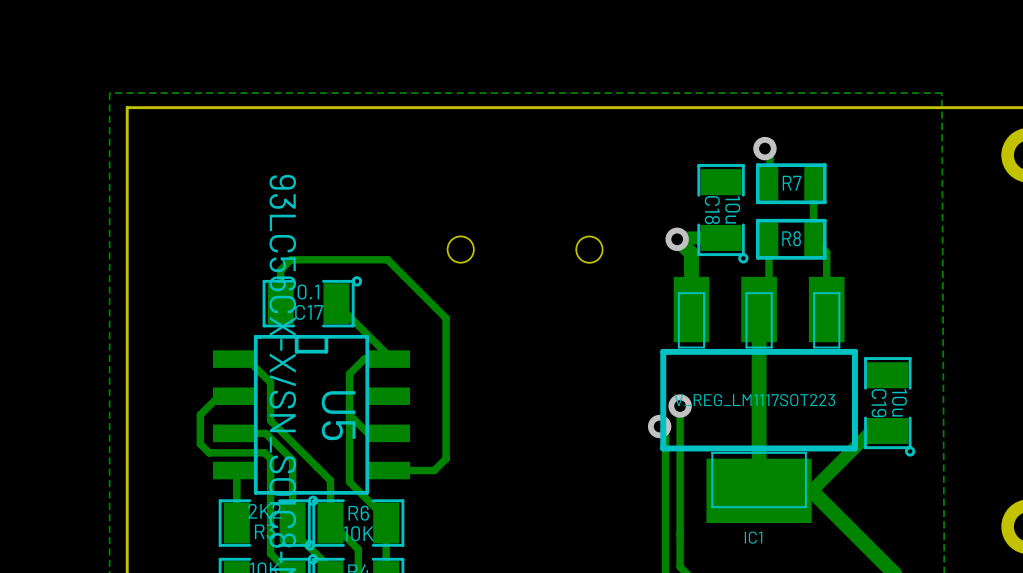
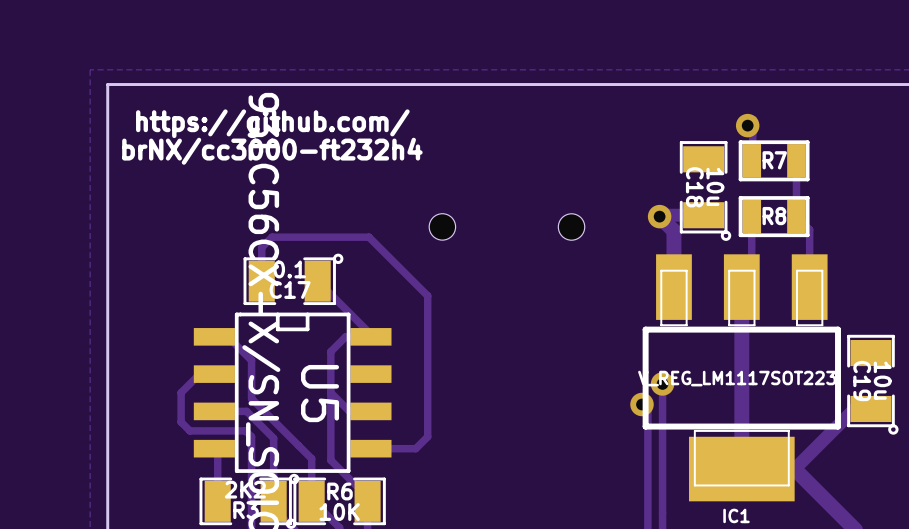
text: none -> https://github.com/ (272, 123)
text: none -> brNX/cc3000-ft232h4 (272, 151)

